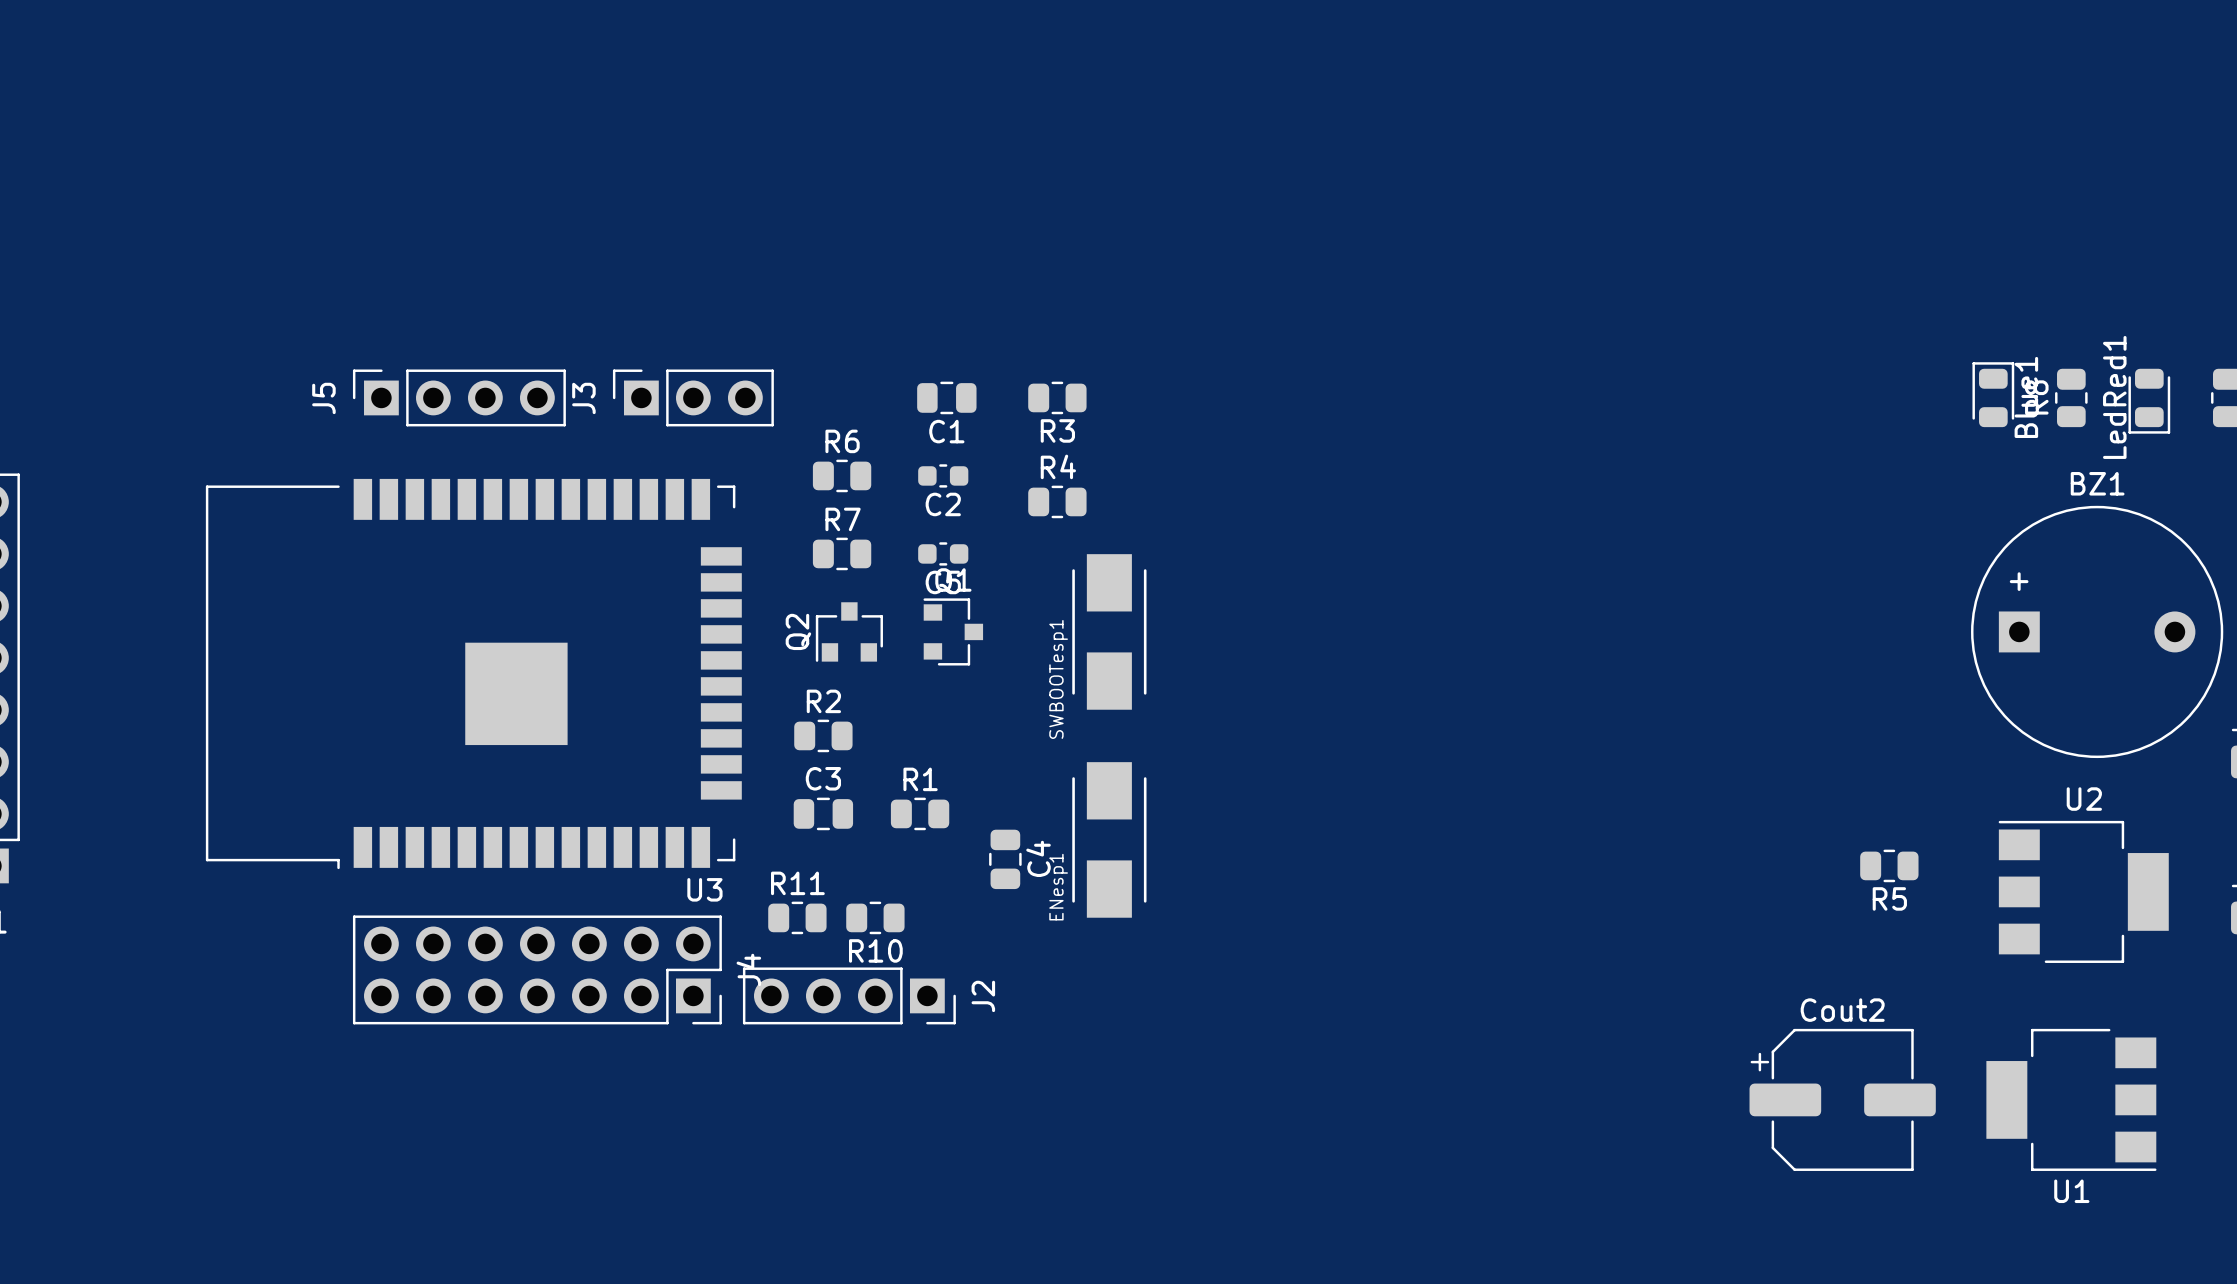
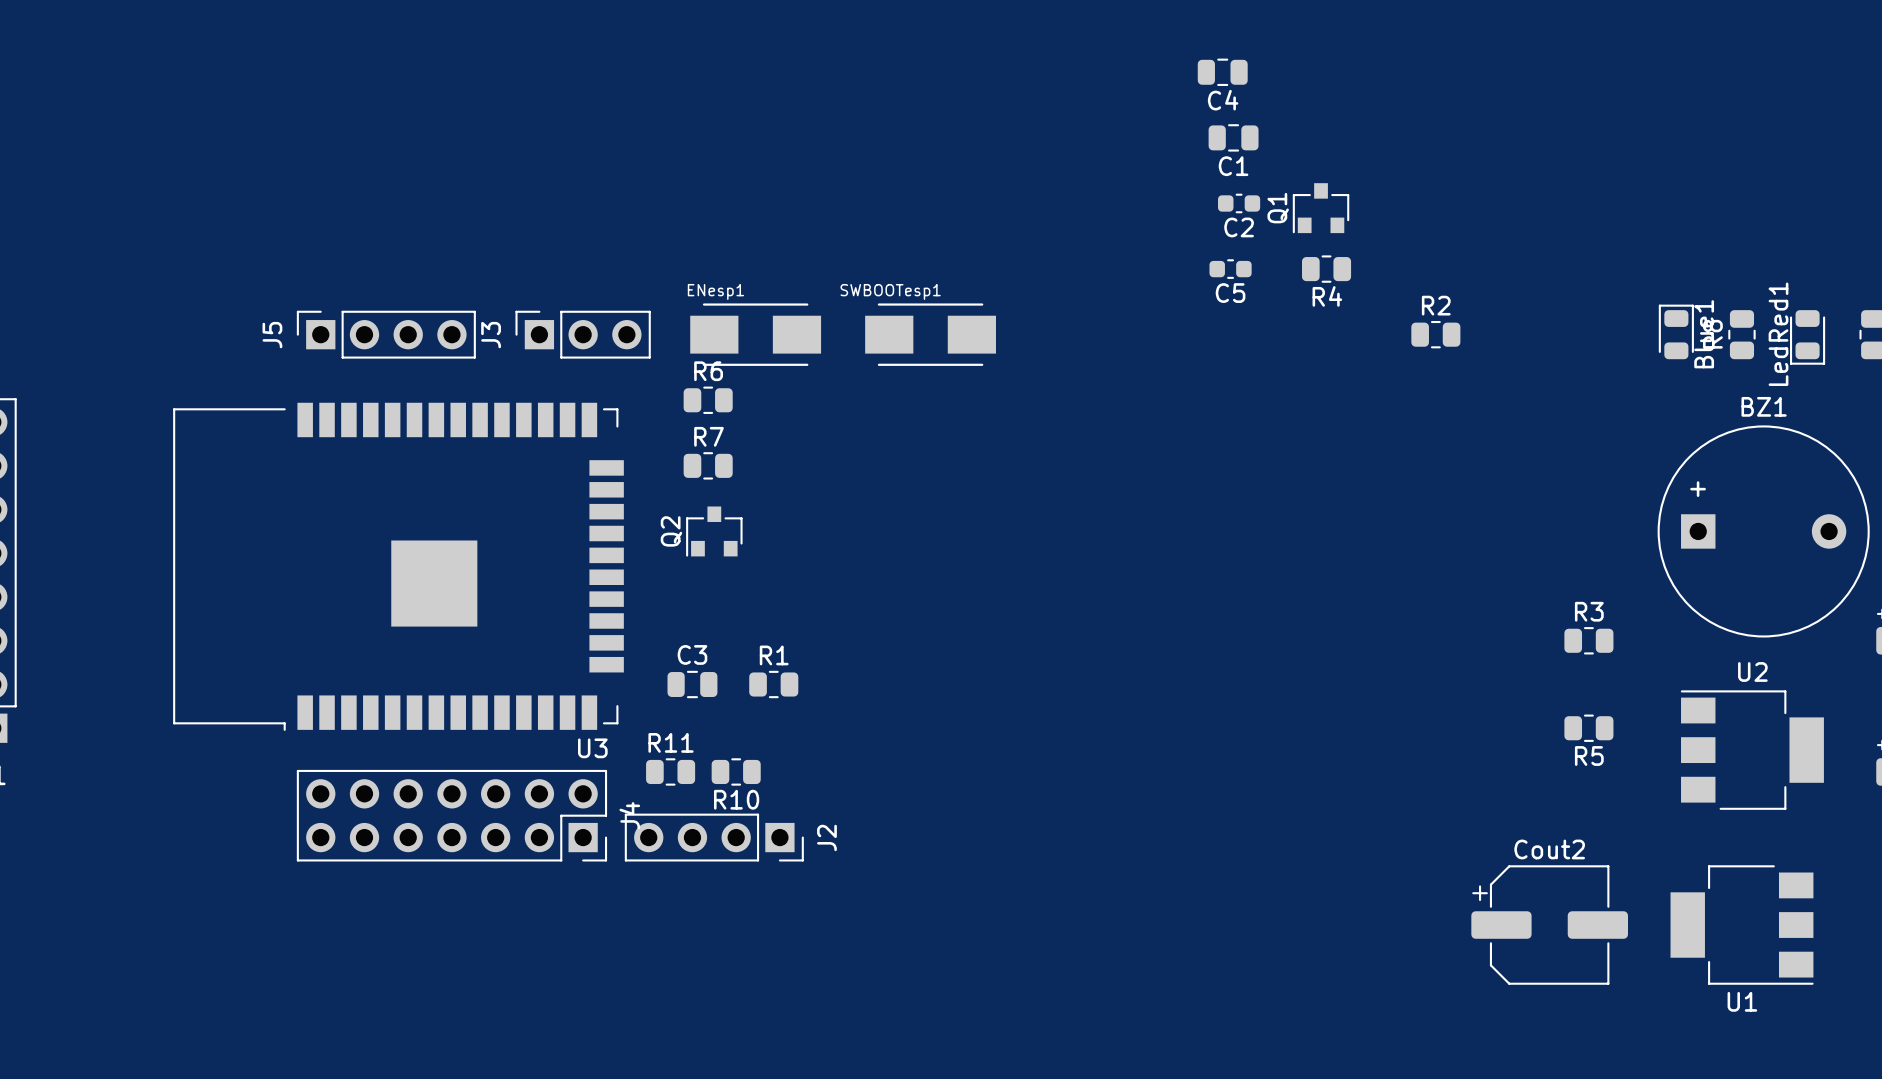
C1 position: (946, 397) -> (1233, 137)
R3 position: (1057, 397) -> (1588, 640)
R3 name position: R3 (1057, 430) -> R3 (1589, 611)
R4 name position: R4 (1058, 466) -> R4 (1327, 296)
C2 position: (943, 475) -> (1239, 203)
R4 position: (1057, 501) -> (1326, 269)
C5 position: (943, 553) -> (1230, 269)
Q1 rotation: 0° (953, 631) -> 90° counterclockwise (1321, 208)
Q1 position: (953, 631) -> (1321, 208)
SWBOOTesp1 rotation: 0° (1109, 631) -> 90° clockwise (930, 334)
SWBOOTesp1 position: (1109, 631) -> (930, 334)
R2 position: (823, 735) -> (1435, 334)
ENesp1 rotation: 0° (1109, 839) -> 90° clockwise (755, 334)
ENesp1 position: (1109, 839) -> (755, 334)
C4 rotation: 0° (1005, 859) -> 90° clockwise (1222, 72)
C4 position: (1005, 859) -> (1222, 72)

